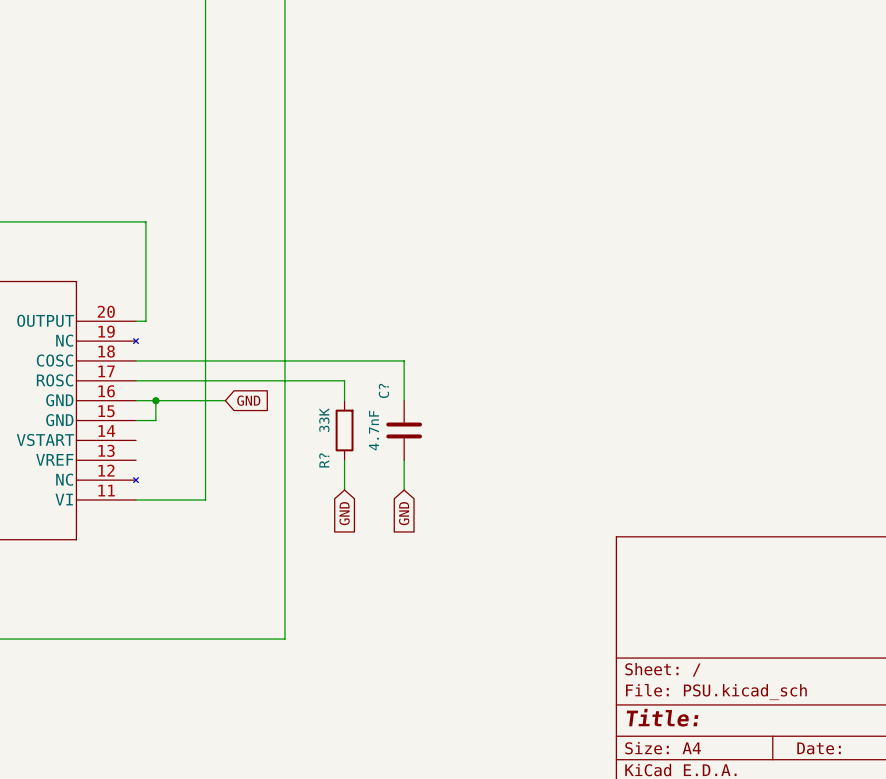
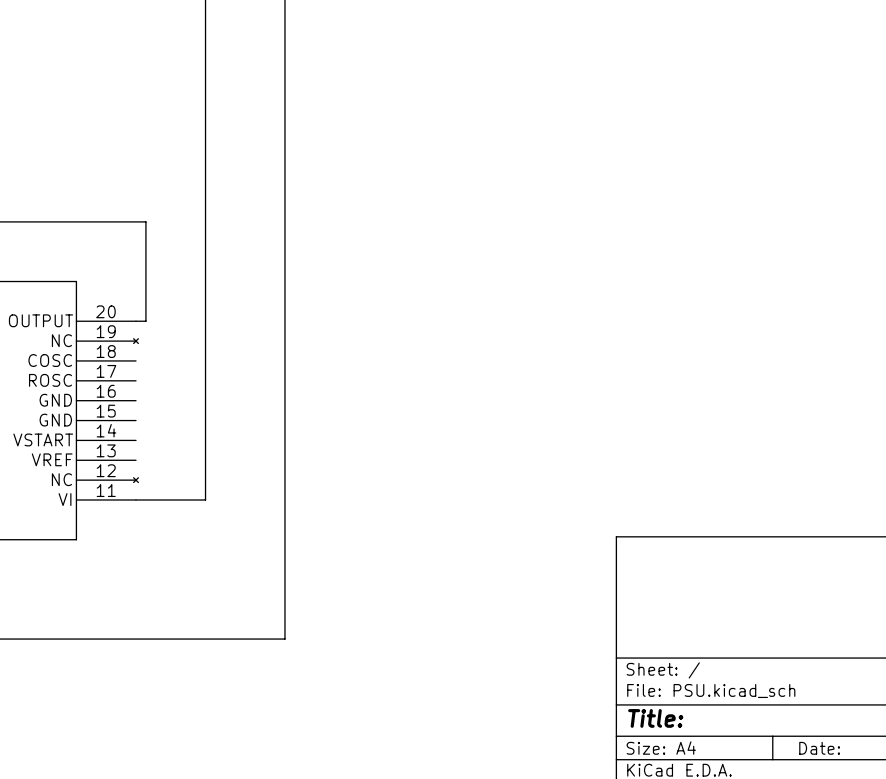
wire: (136, 360) (404, 360) (404, 400) -> none
wire: (136, 380) (344, 380) (344, 400) -> none
wire: (136, 400) (225, 400) -> none
wire: (155, 400) (155, 420) (136, 420) -> none
junction: (155, 400) -> none
global label: GND (248, 400) -> none
R?: 33K (344, 430) -> none
C?: 4.7nF (404, 430) -> none
wire: (344, 460) (344, 490) -> none
wire: (404, 460) (404, 490) -> none
global label: GND (344, 513) -> none
global label: GND (404, 513) -> none

